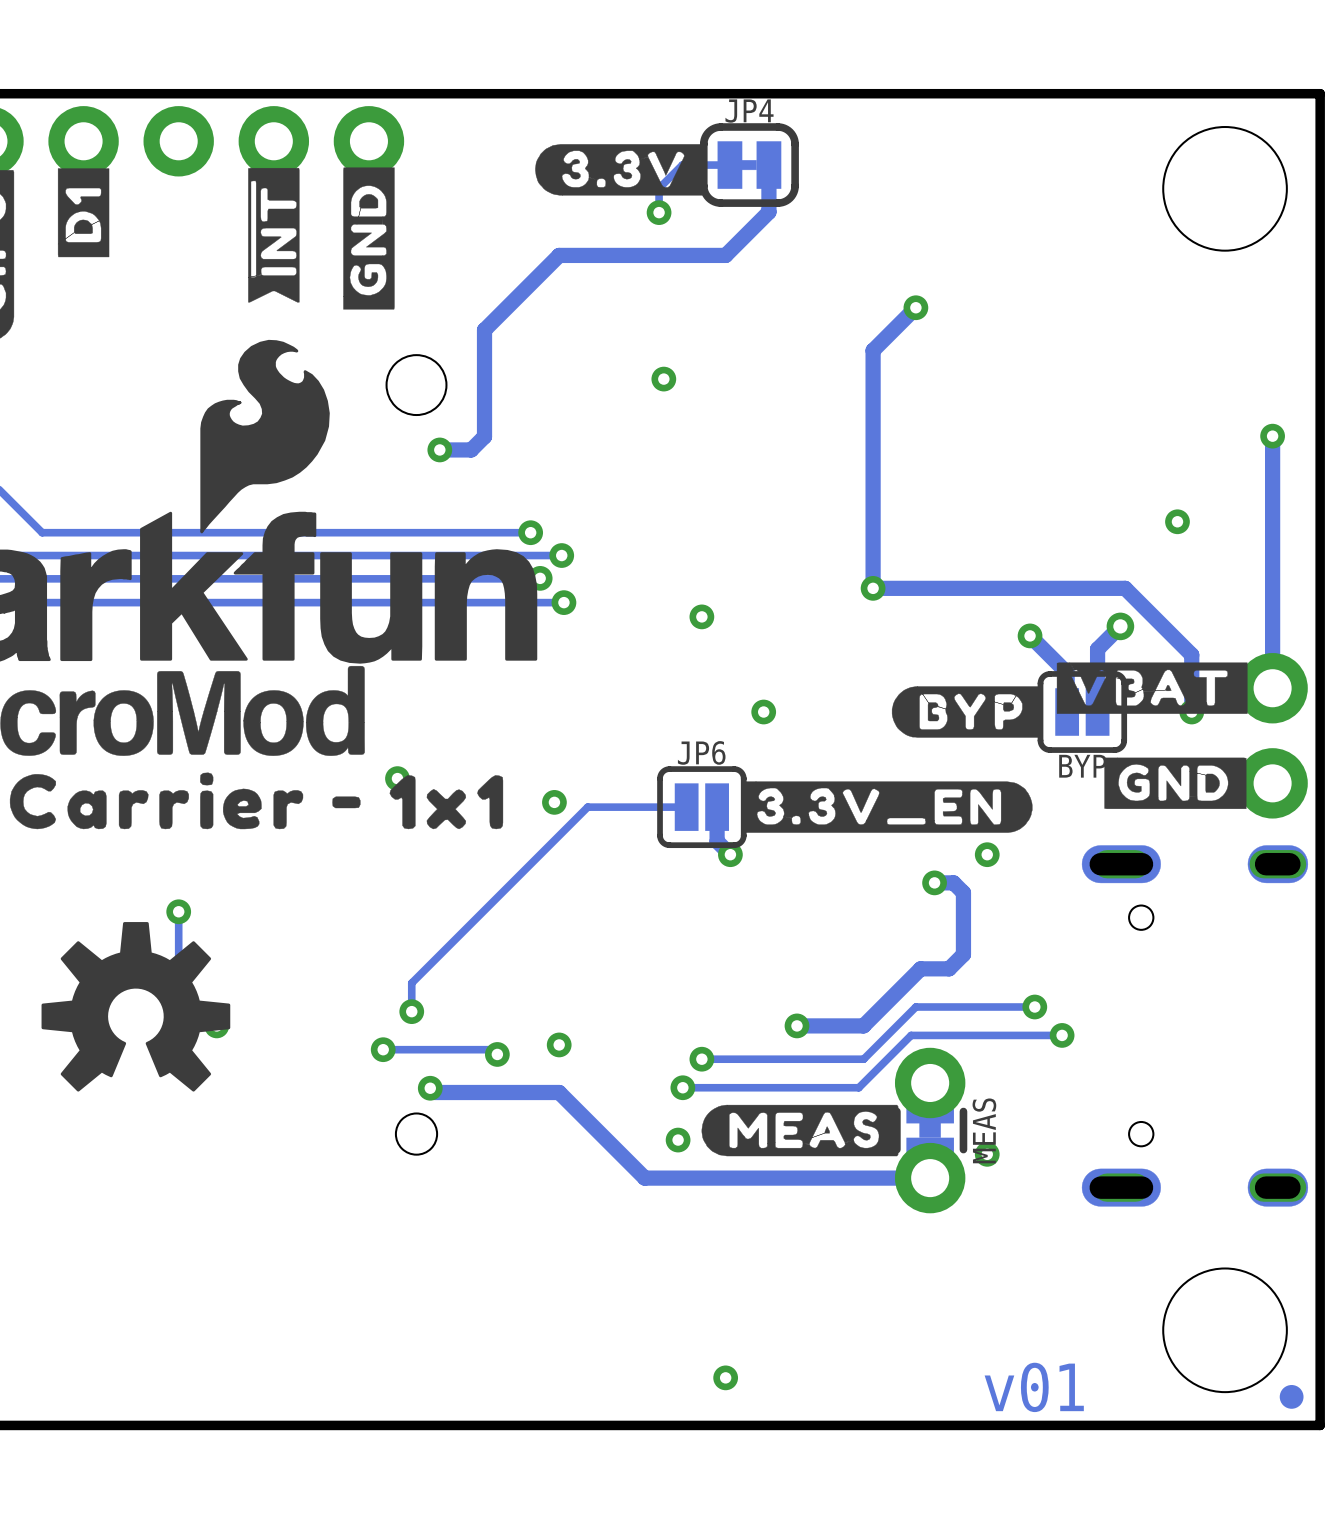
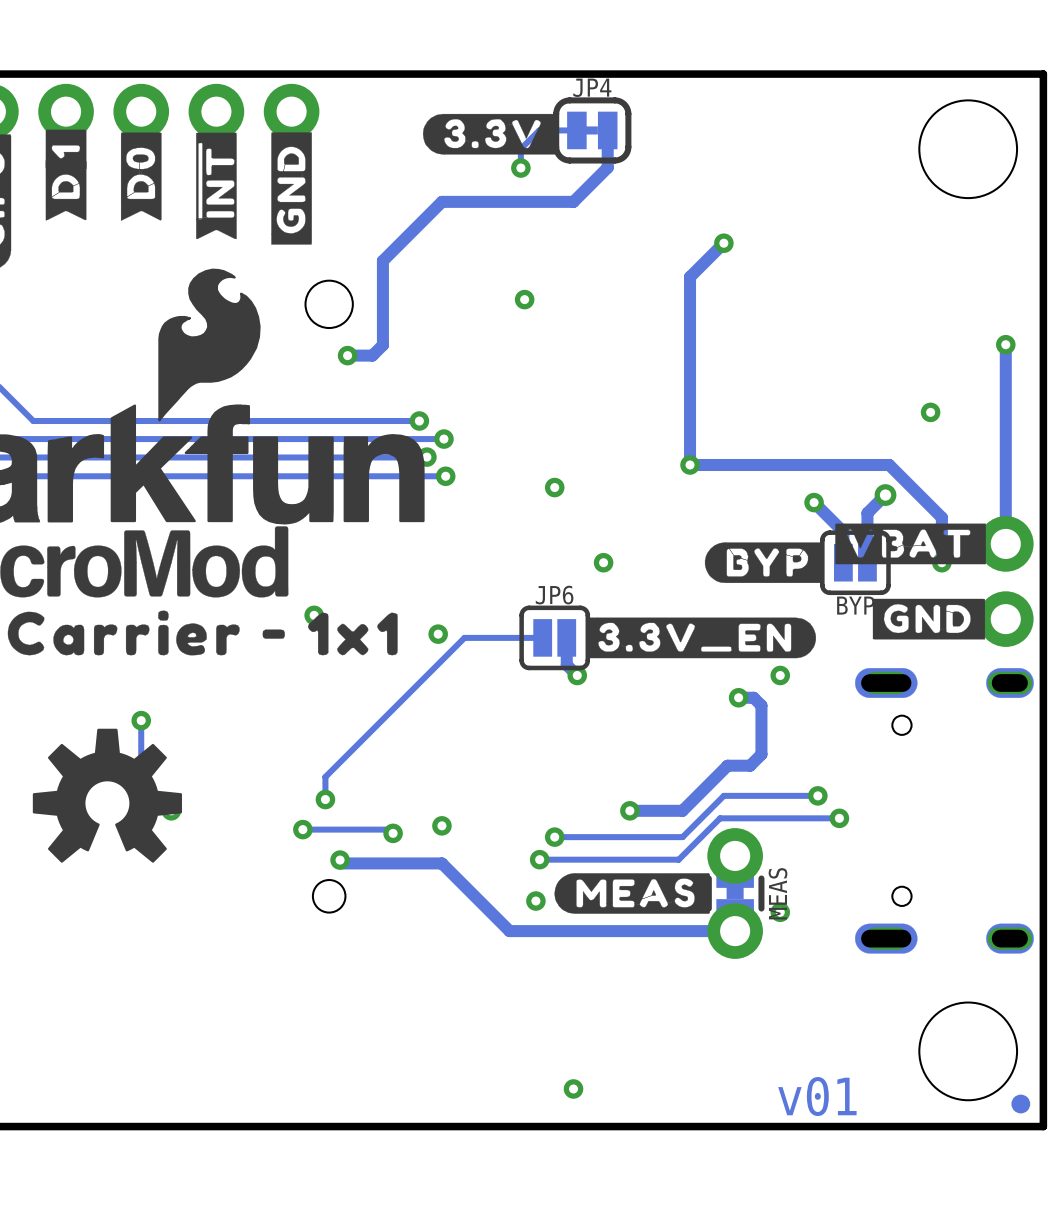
drawing: none -> [45, 129, 162, 221]
drawing: [57, 168, 110, 258] -> none

